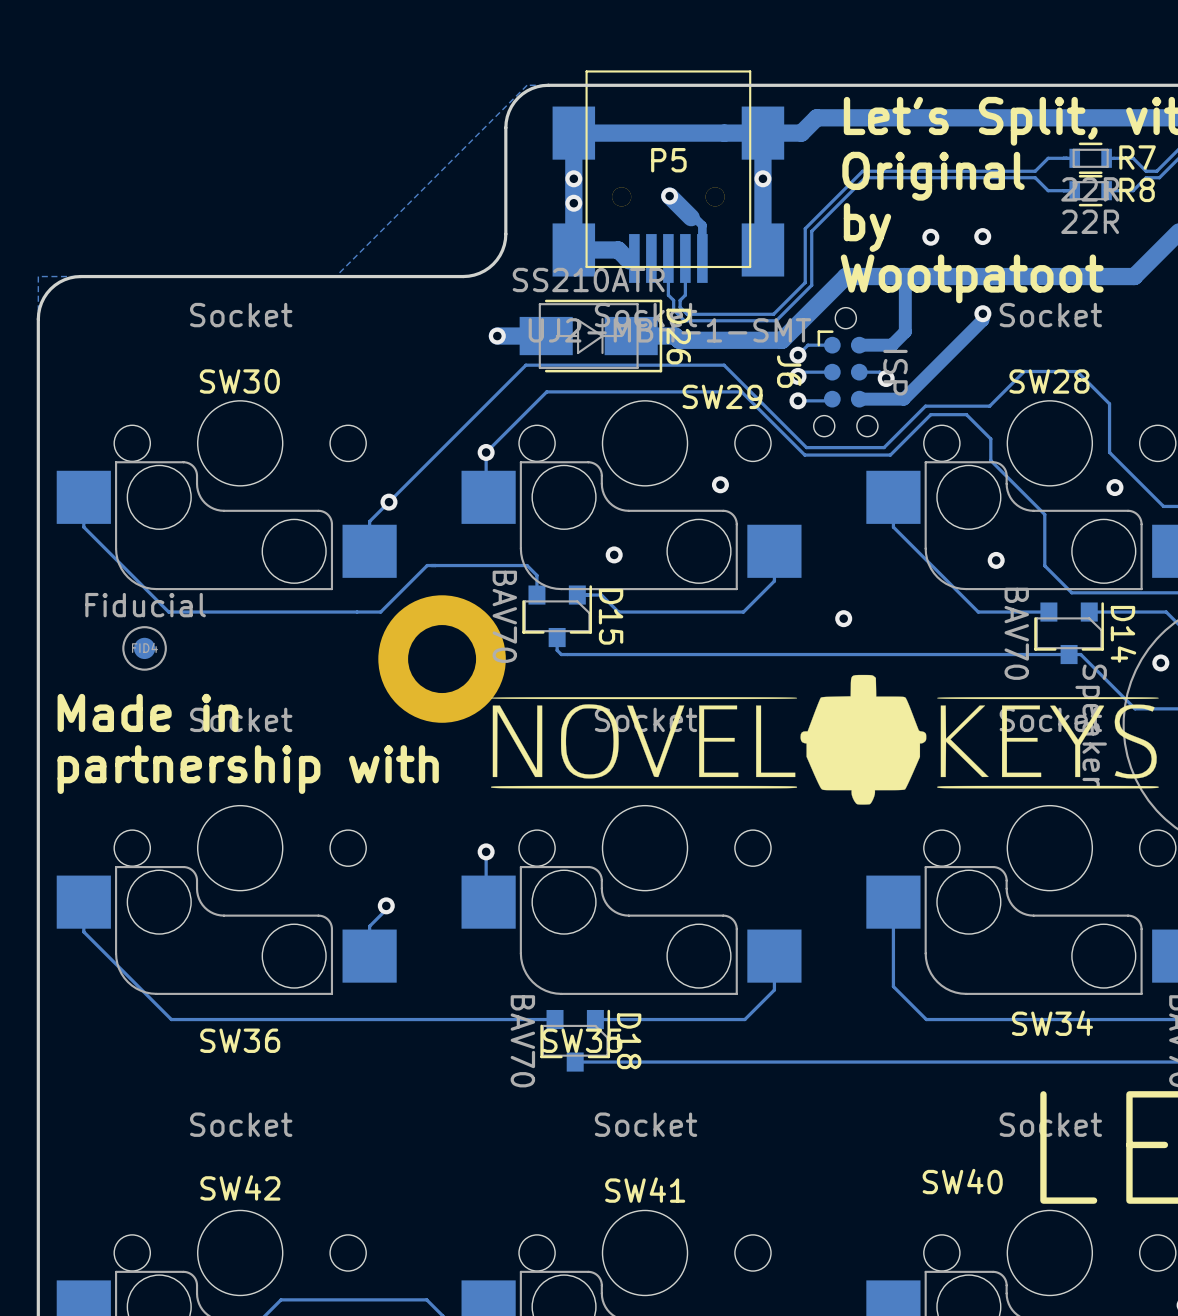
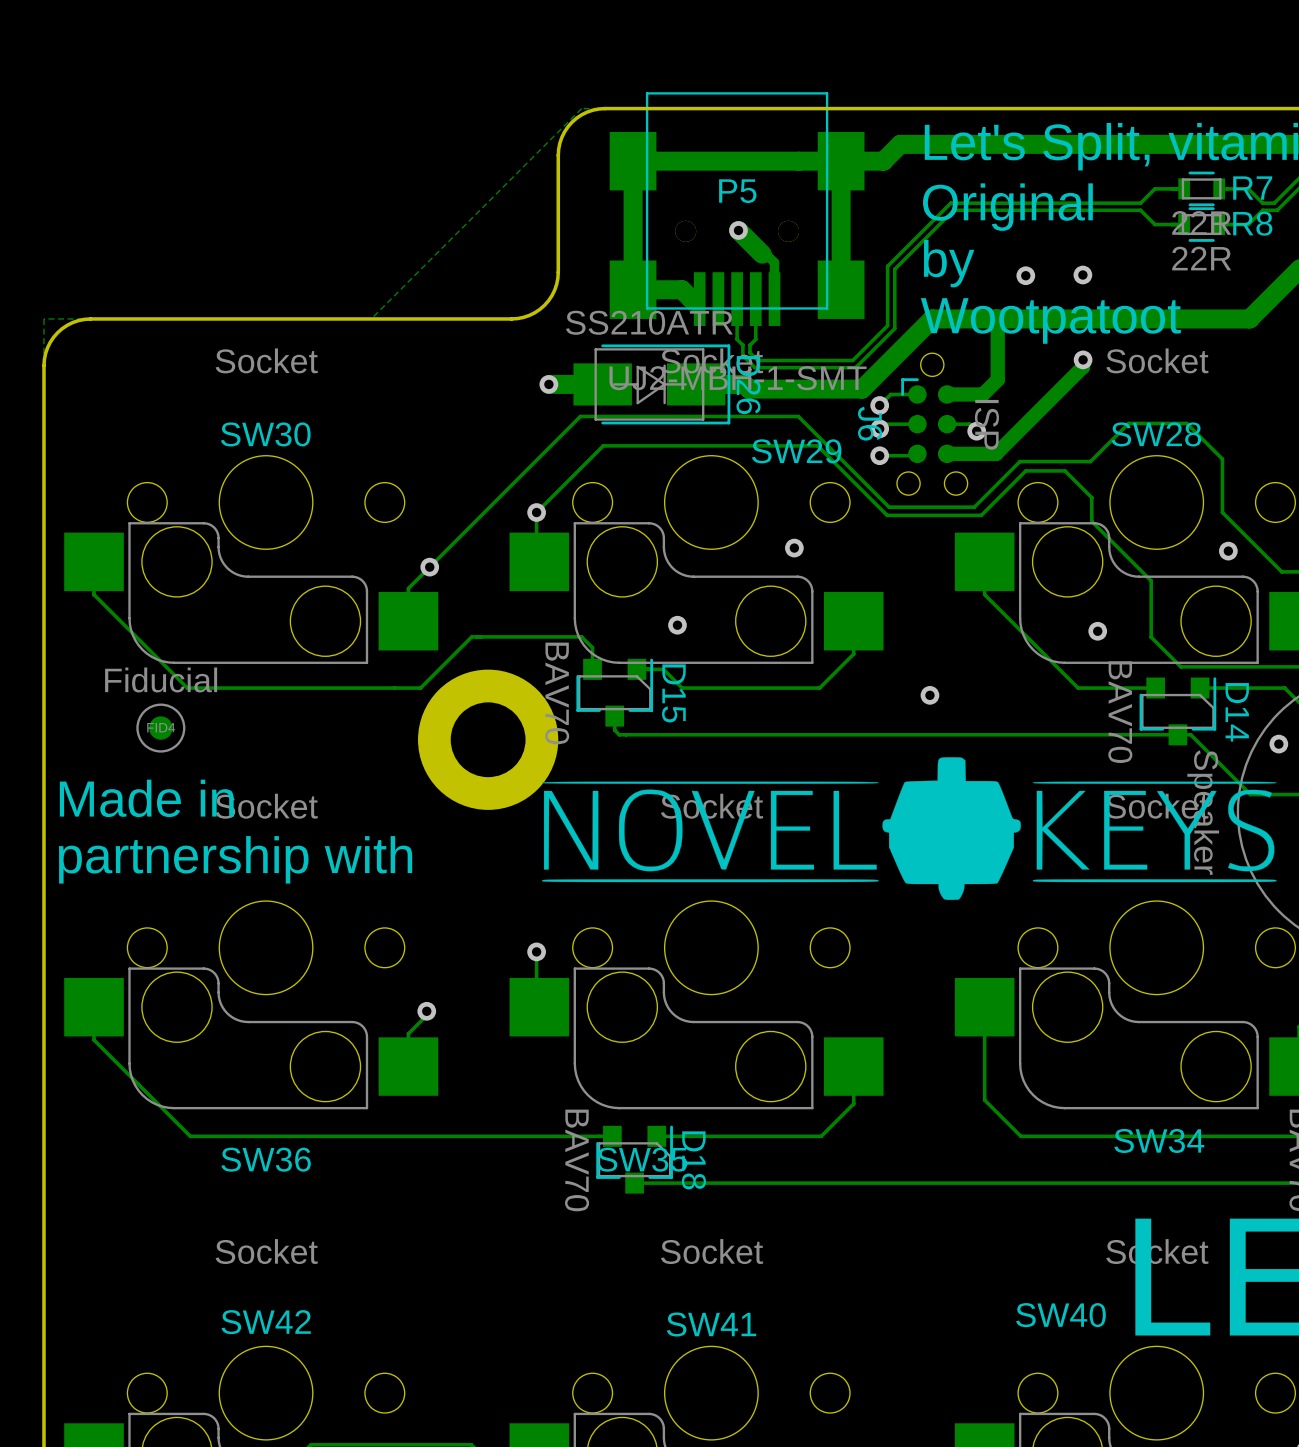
via: (573, 178) -> none
via: (762, 178) -> none
via: (573, 203) -> none

